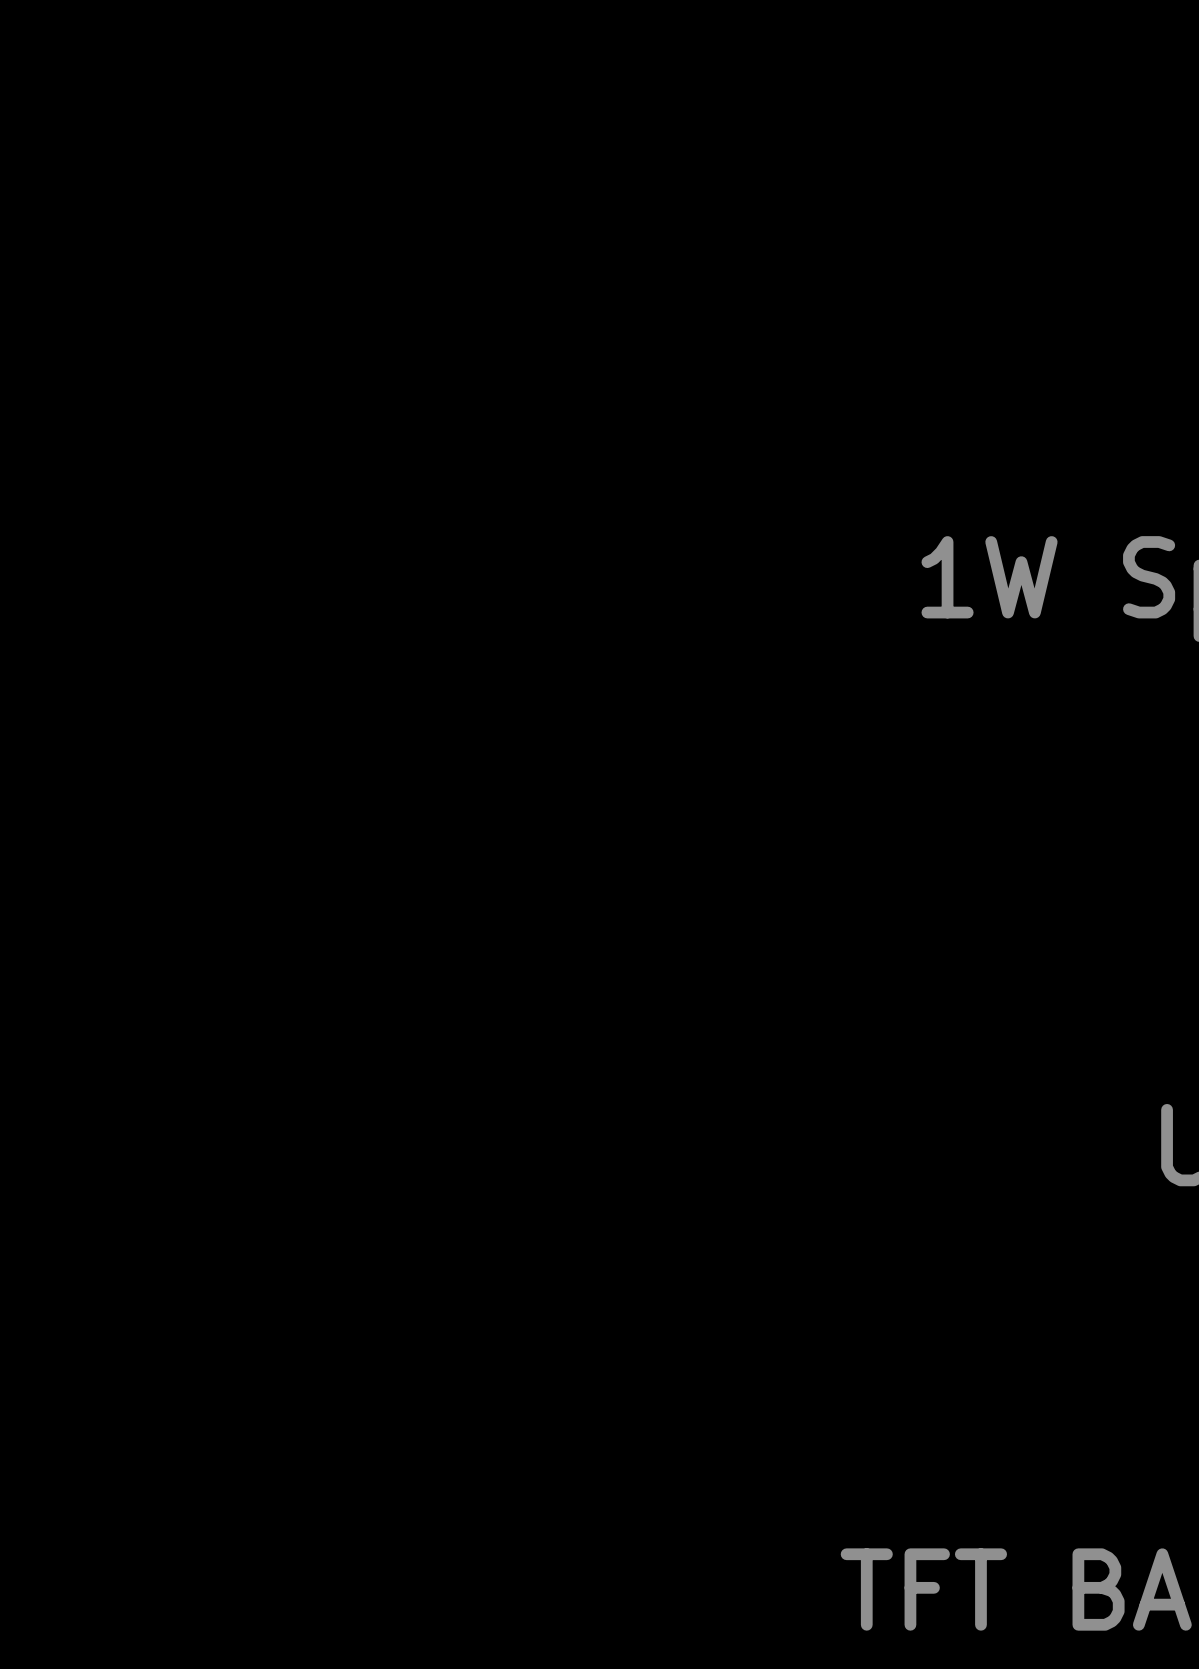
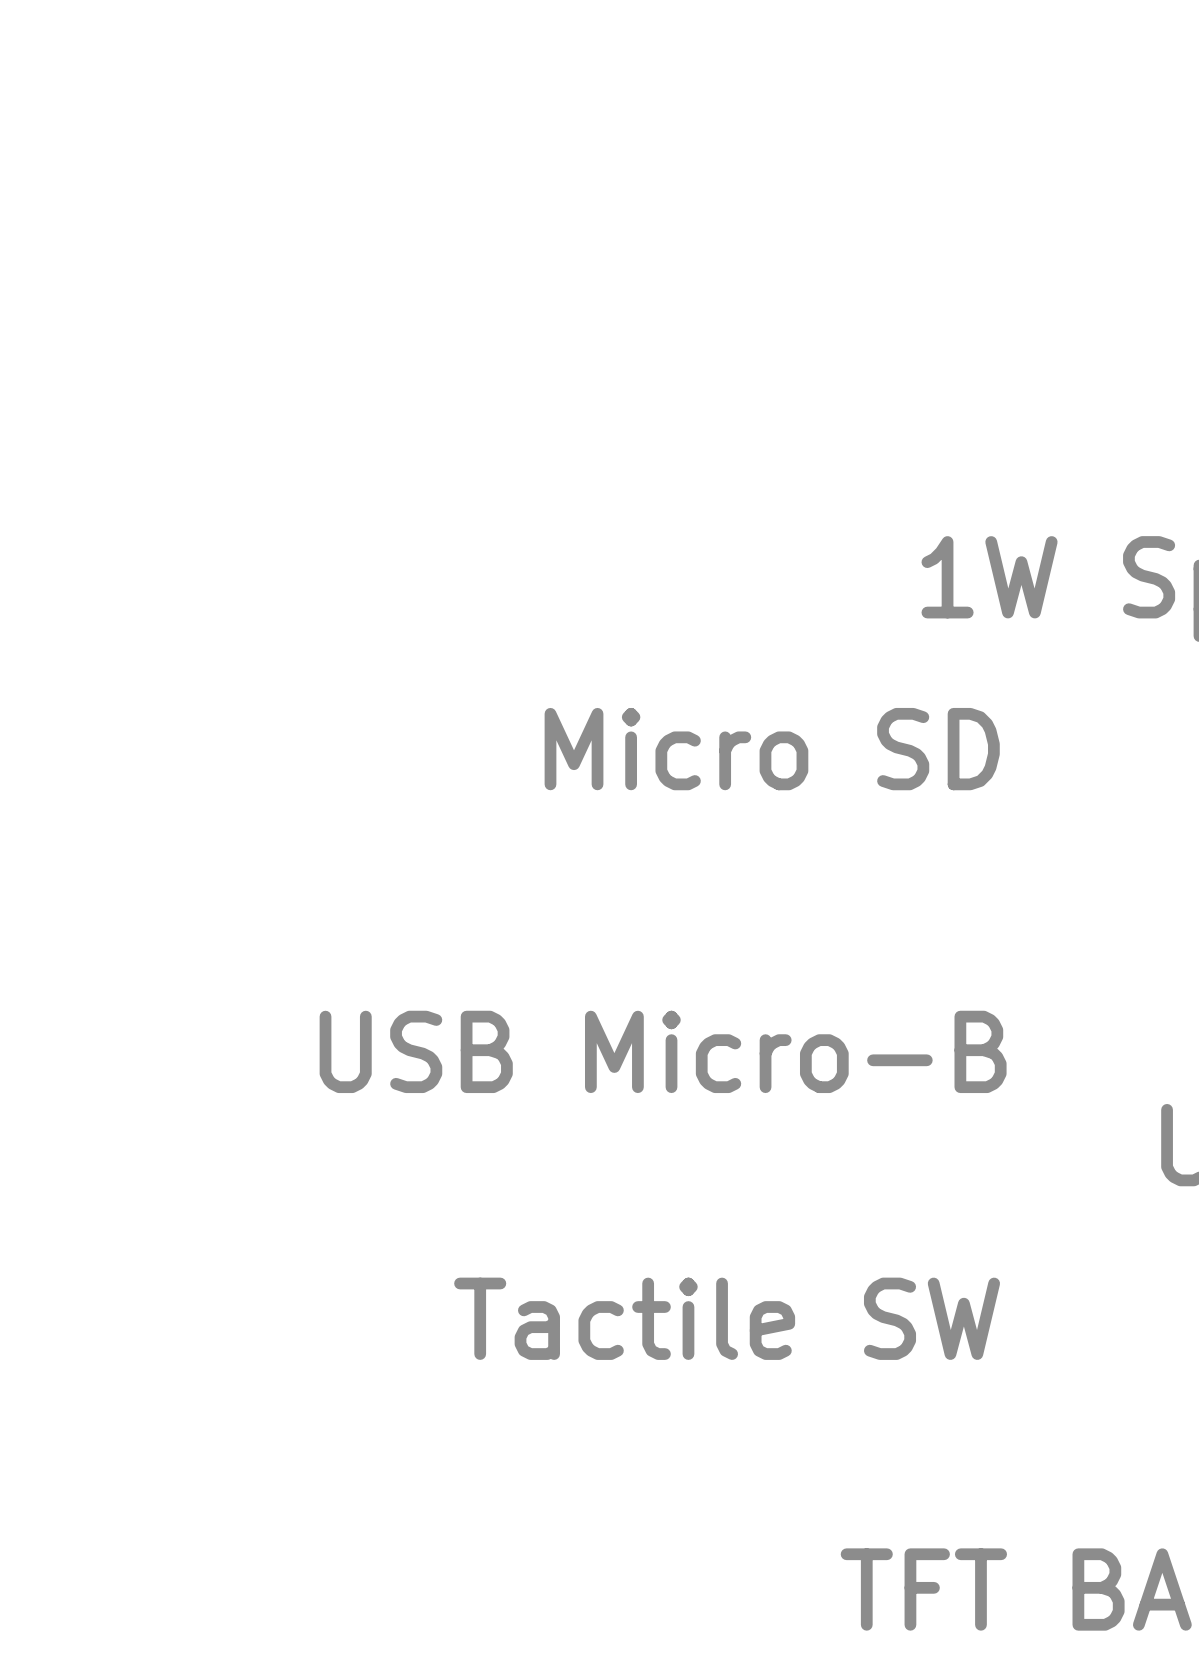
text: none -> Micro SD (772, 749)
text: none -> USB Micro-B (663, 1051)
text: none -> Tactile SW (727, 1318)

